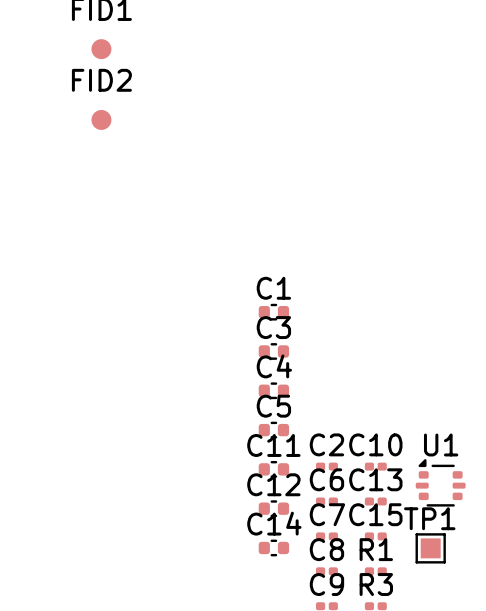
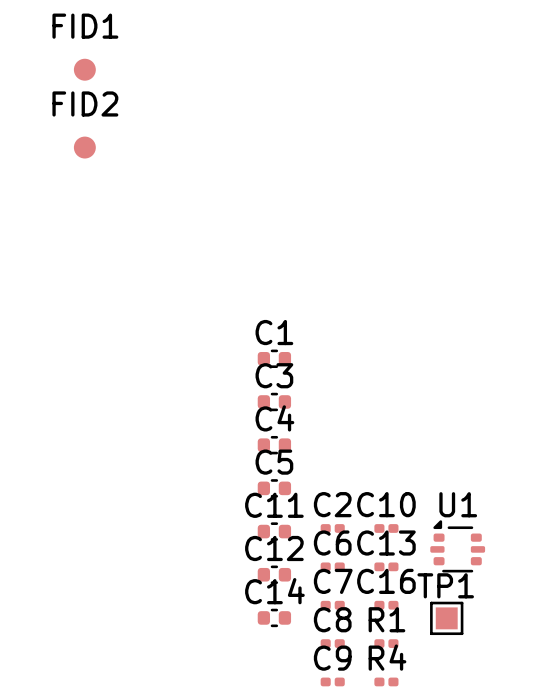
C15 name: C15 (375, 514) -> C16 (386, 581)
R3 name: R3 (376, 584) -> R4 (387, 657)

